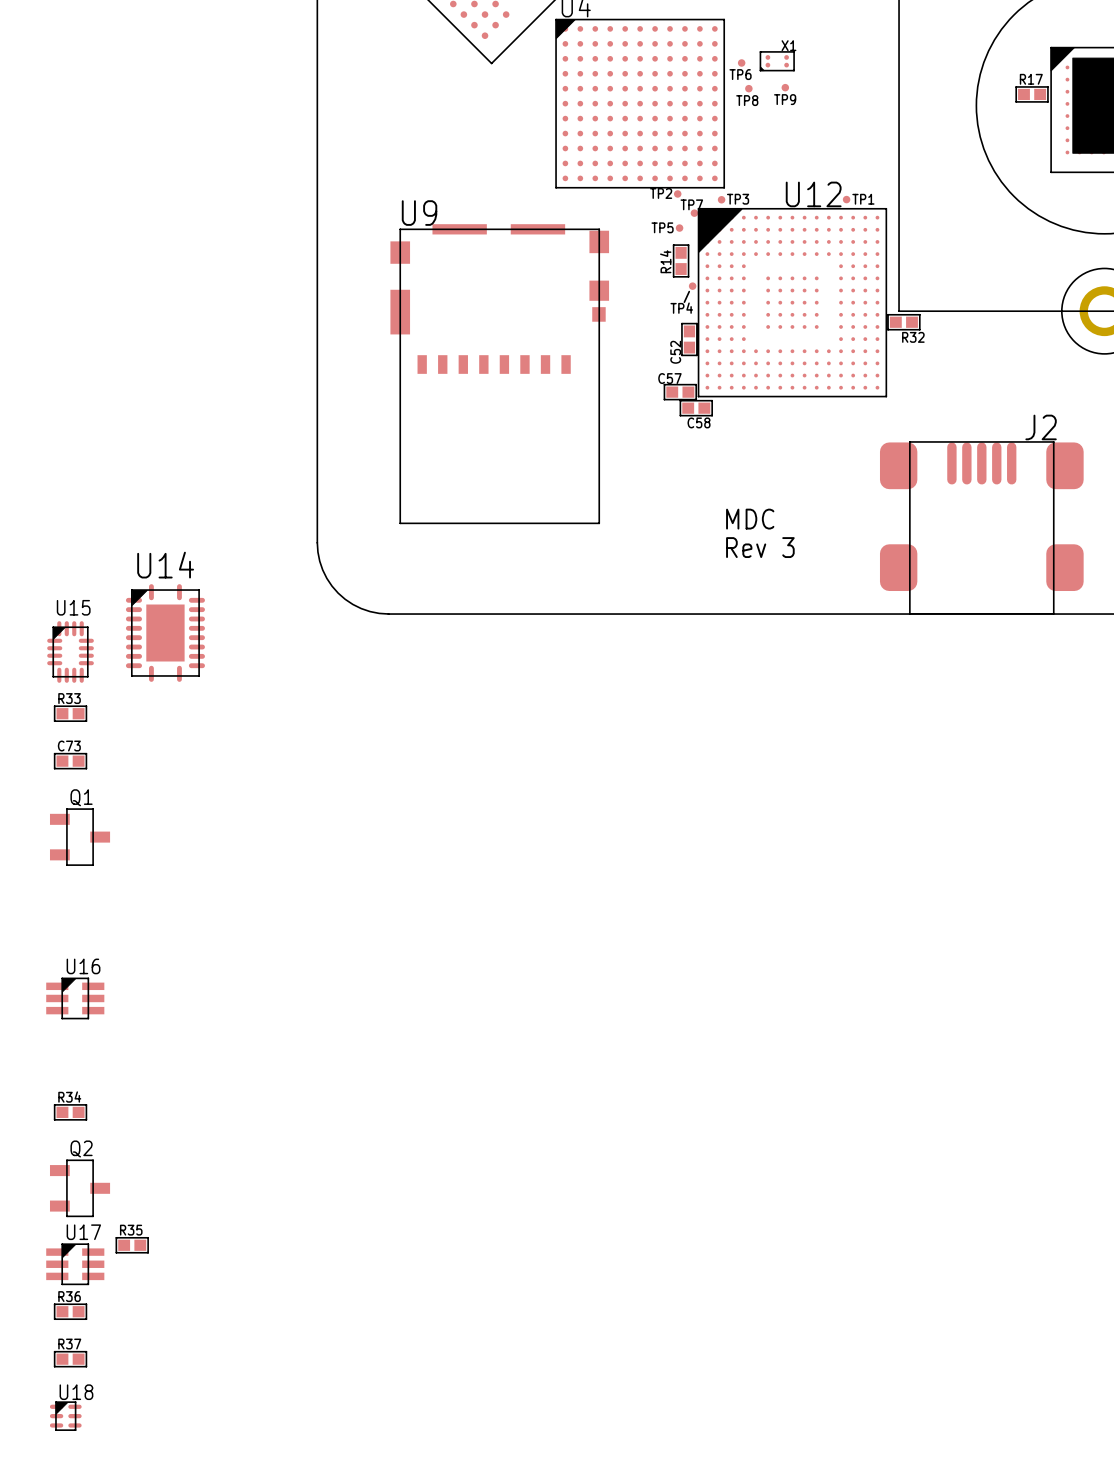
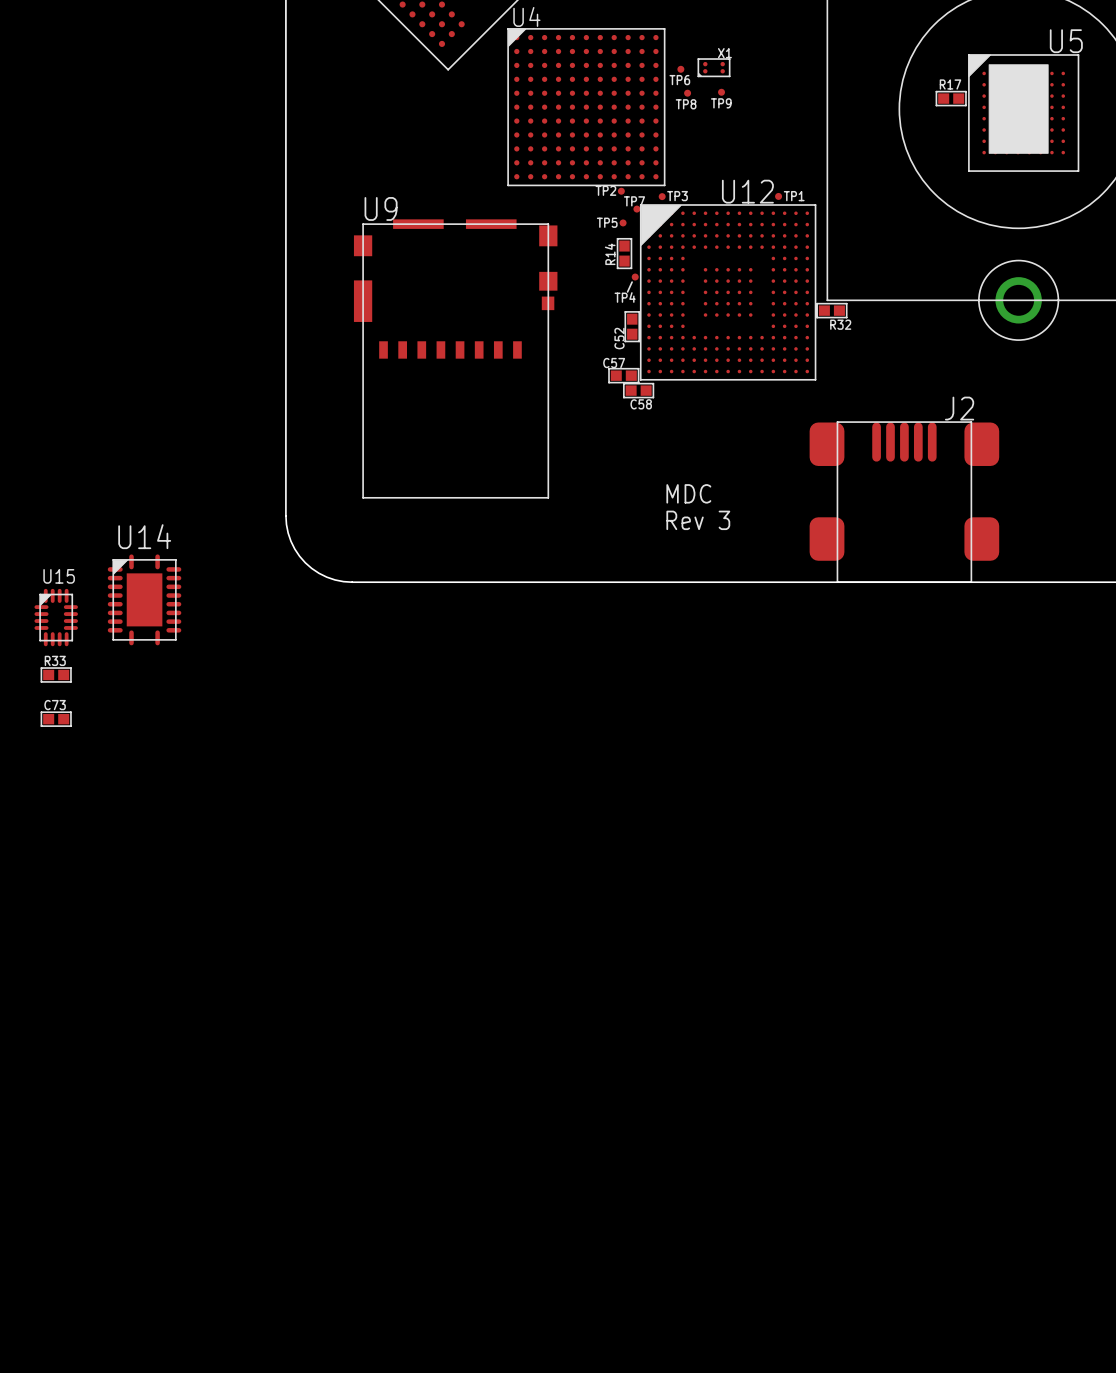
Q1: (80, 837) -> none
U16: (75, 998) -> none
R34: (70, 1112) -> none
Q2: (80, 1188) -> none
R35: (132, 1245) -> none
U17: (75, 1264) -> none
R36: (70, 1311) -> none
R37: (70, 1359) -> none
U18: (65, 1416) -> none

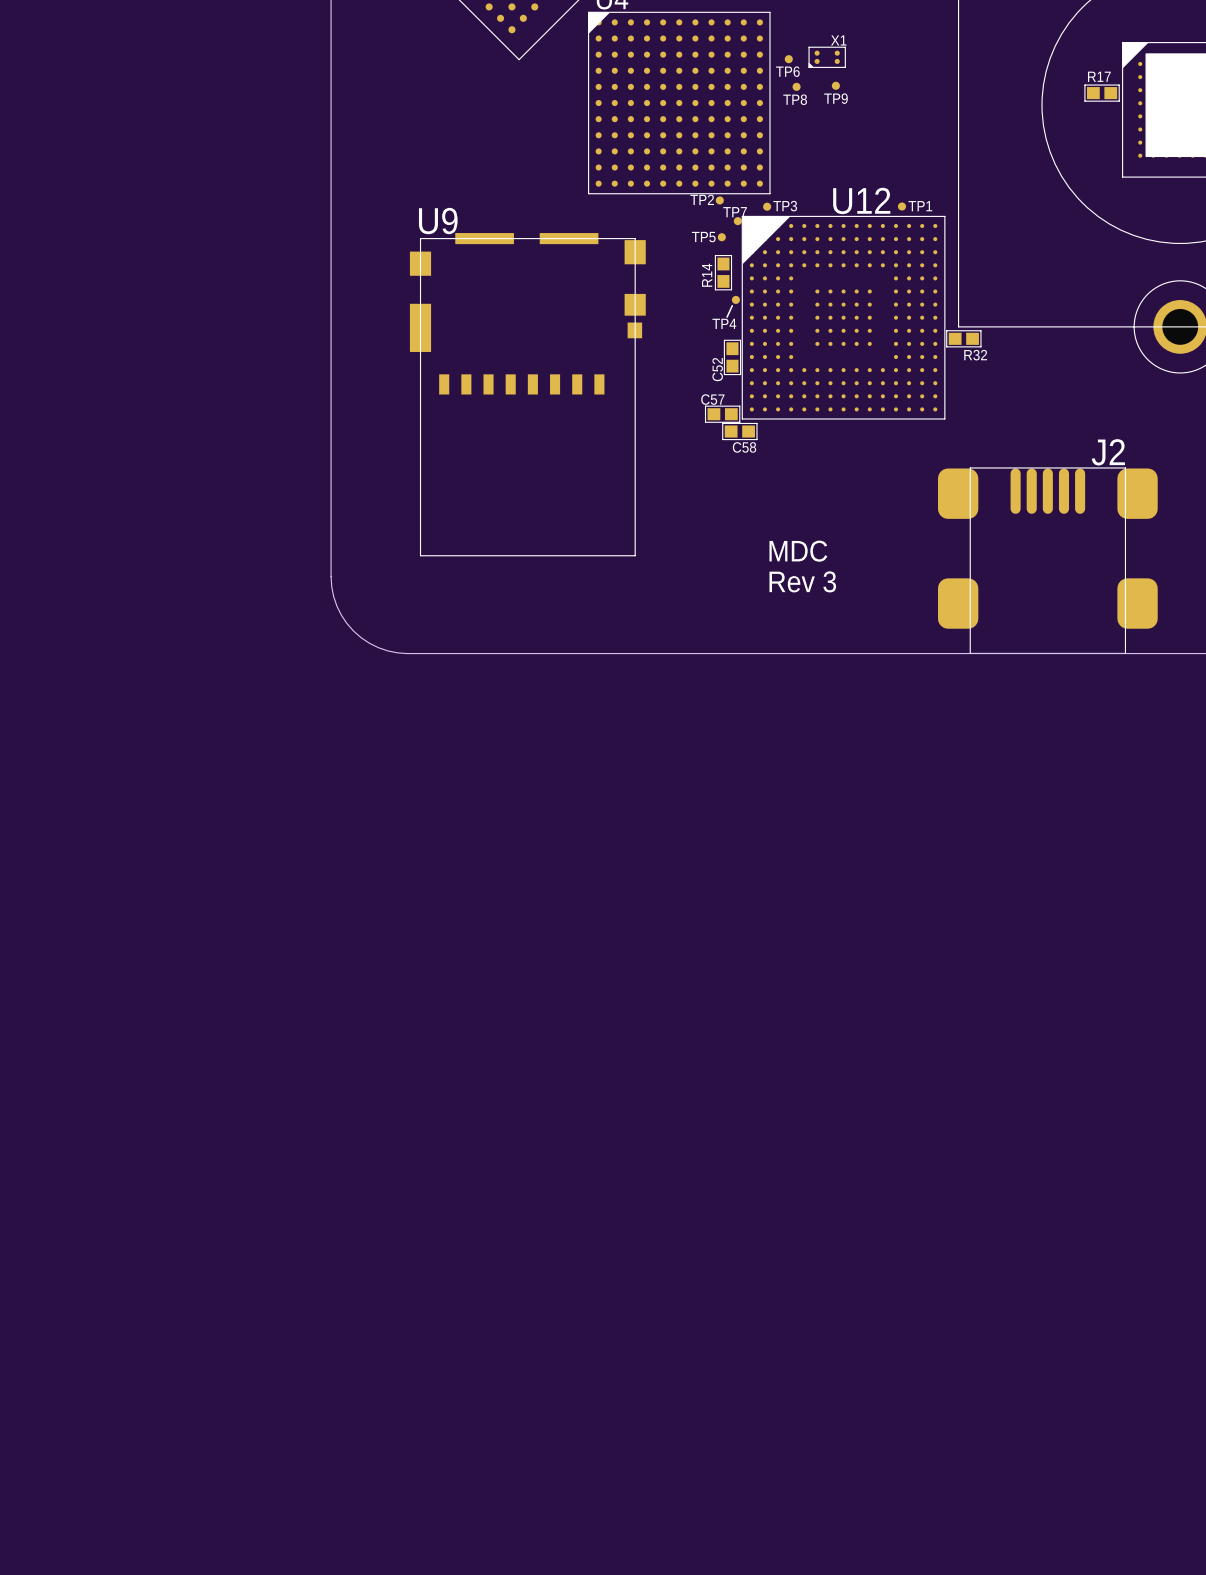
U14: (144, 599) -> none
U15: (56, 617) -> none
R33: (56, 674) -> none
C73: (56, 719) -> none

